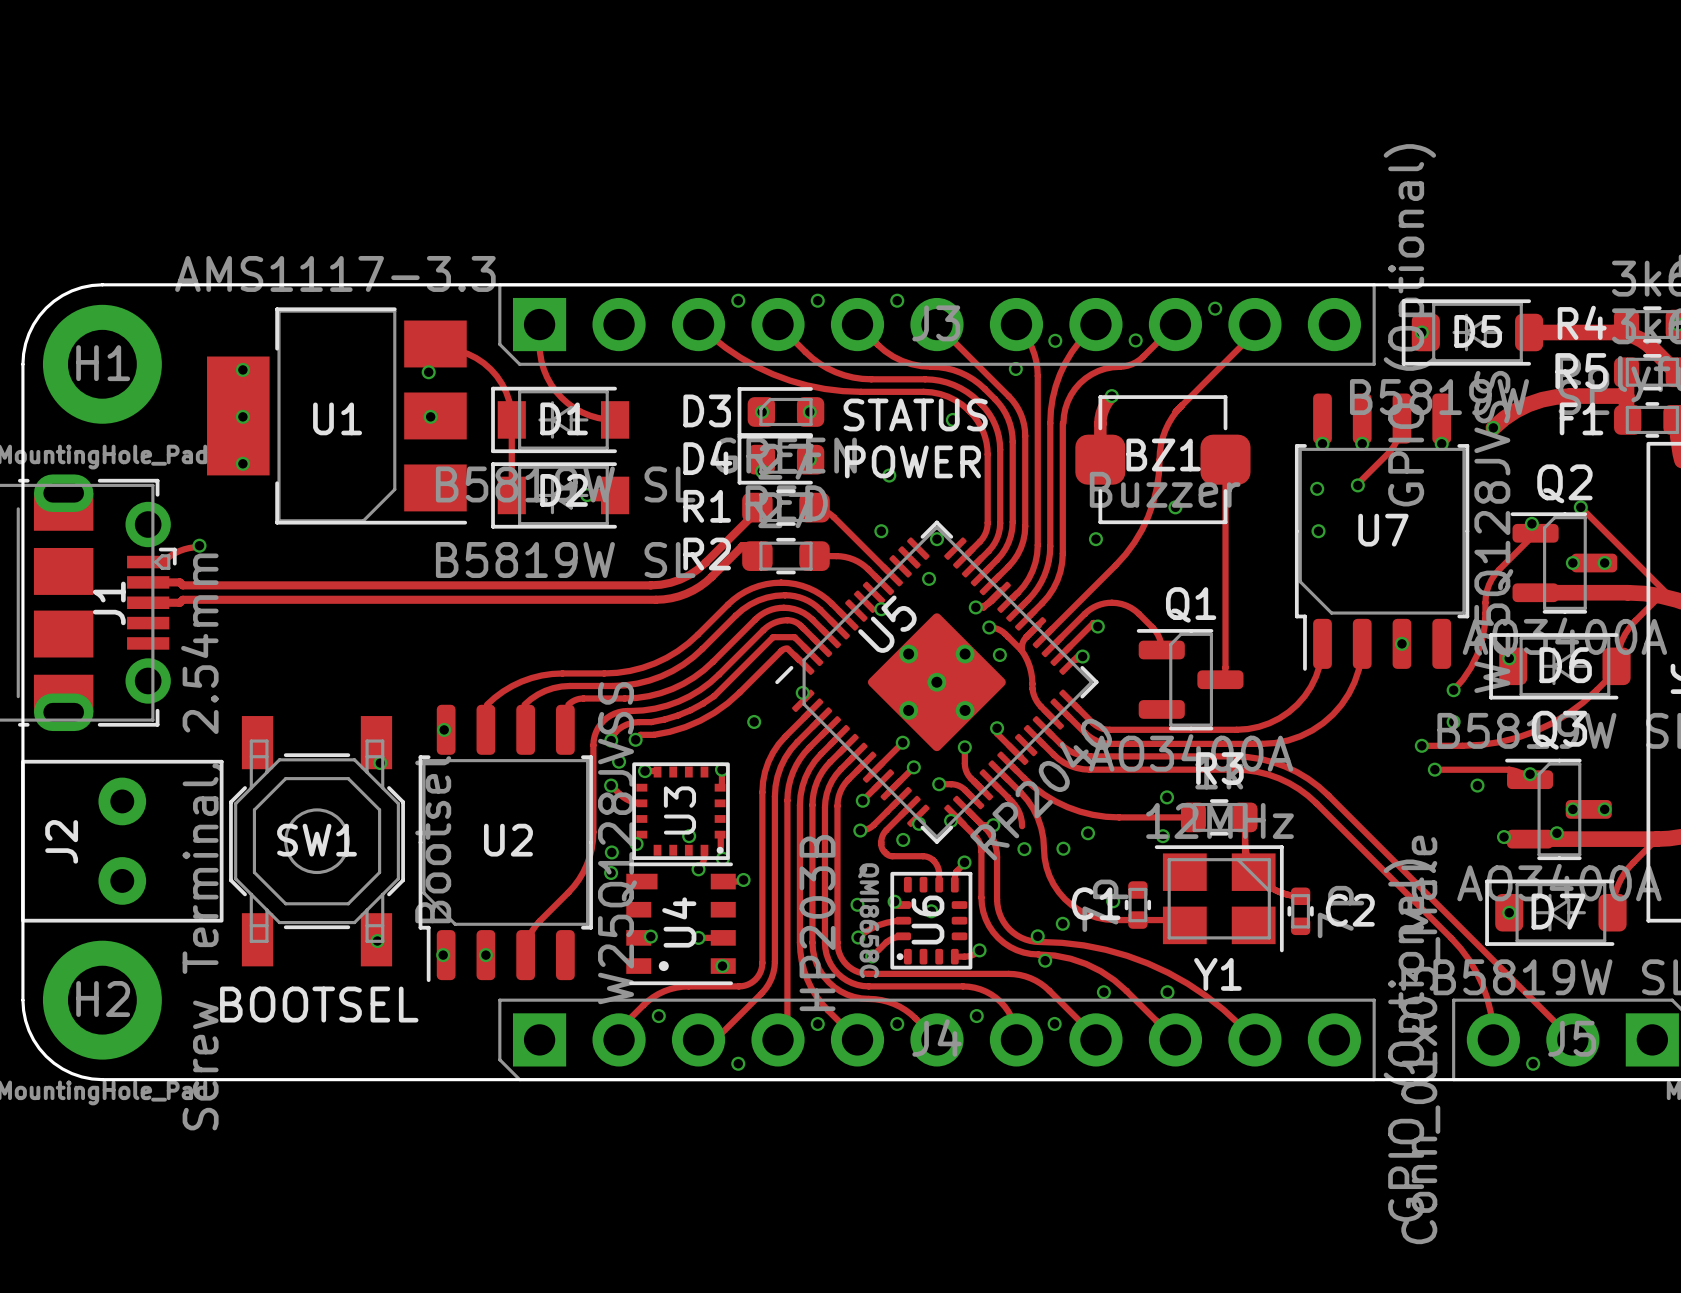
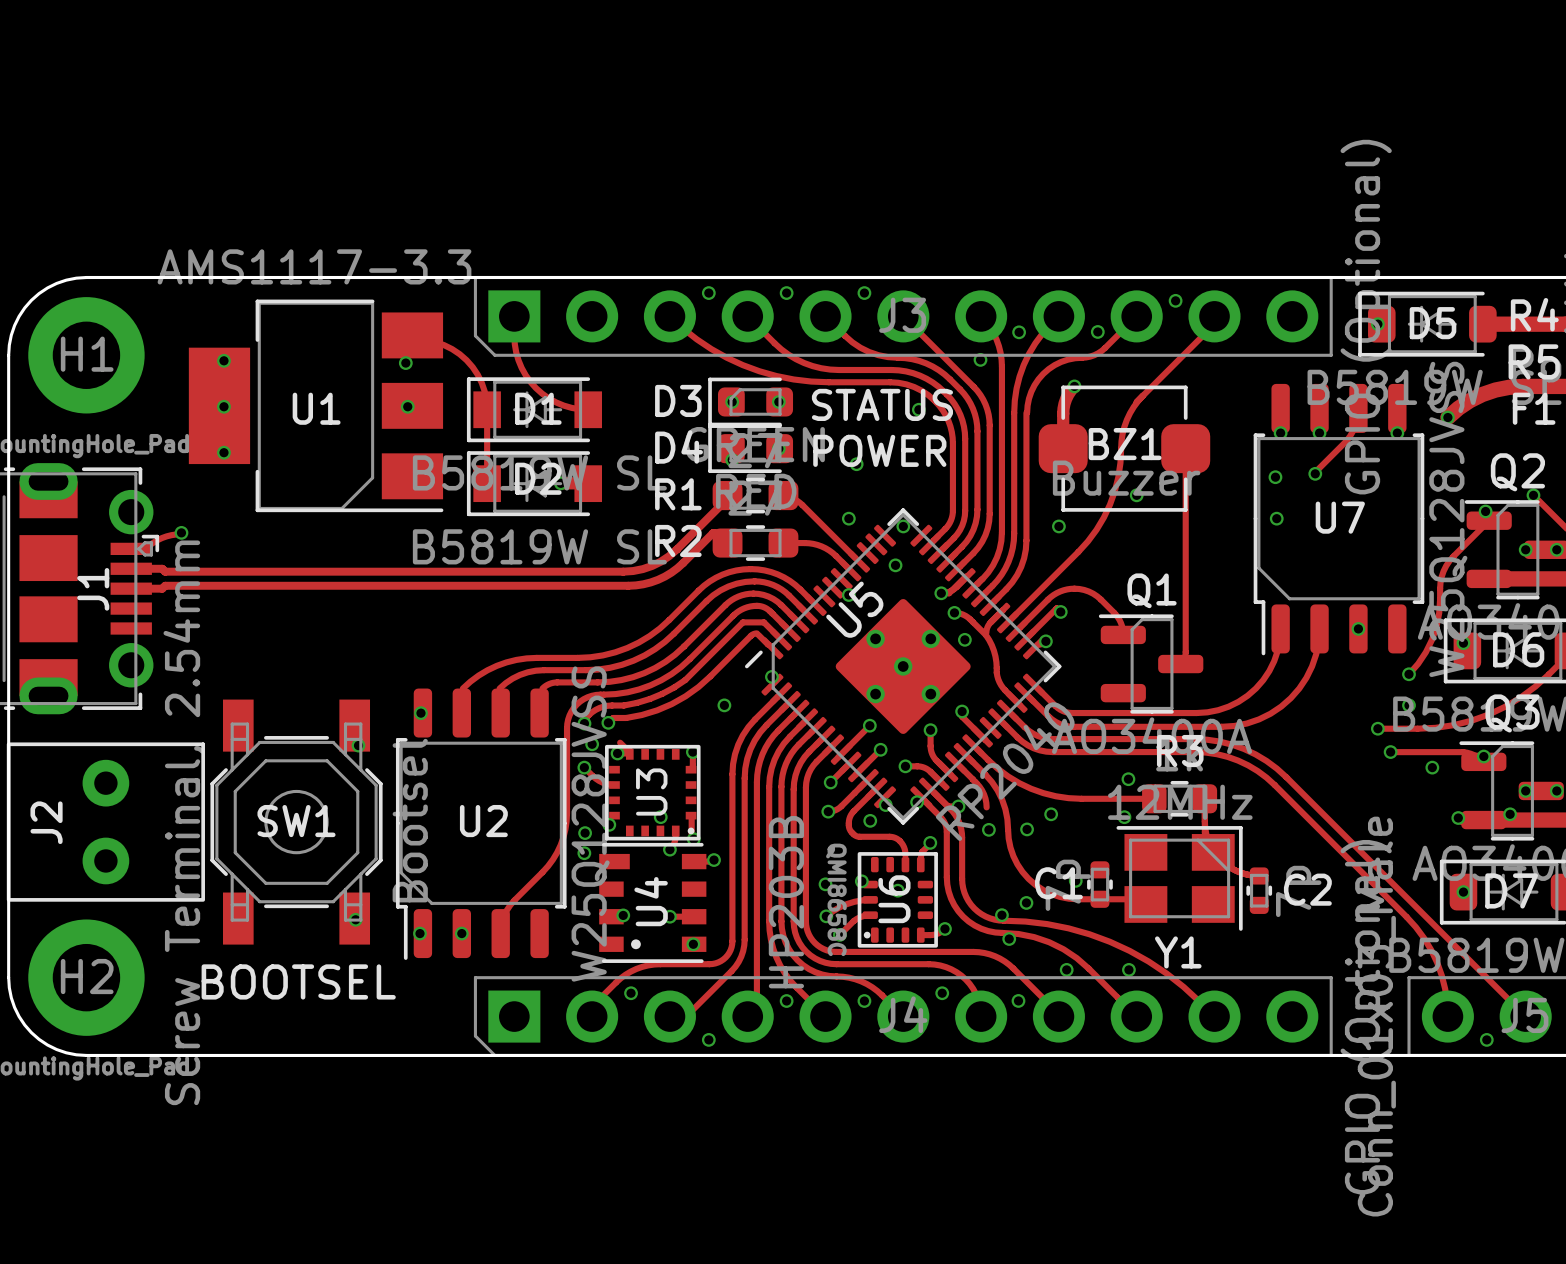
track: none -> (620, 742) (629, 750) (627, 750)

